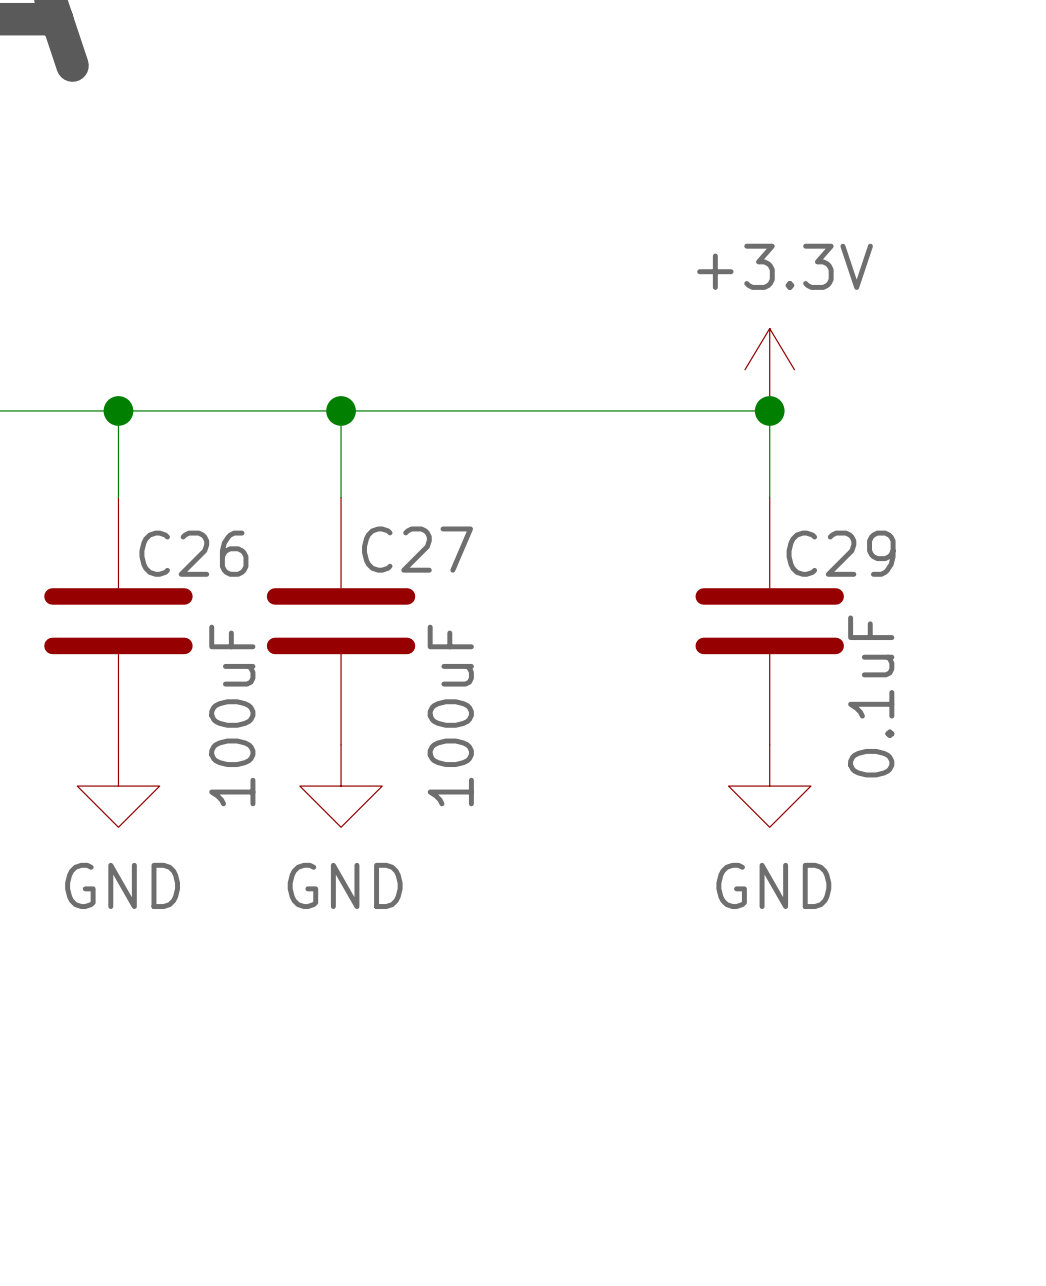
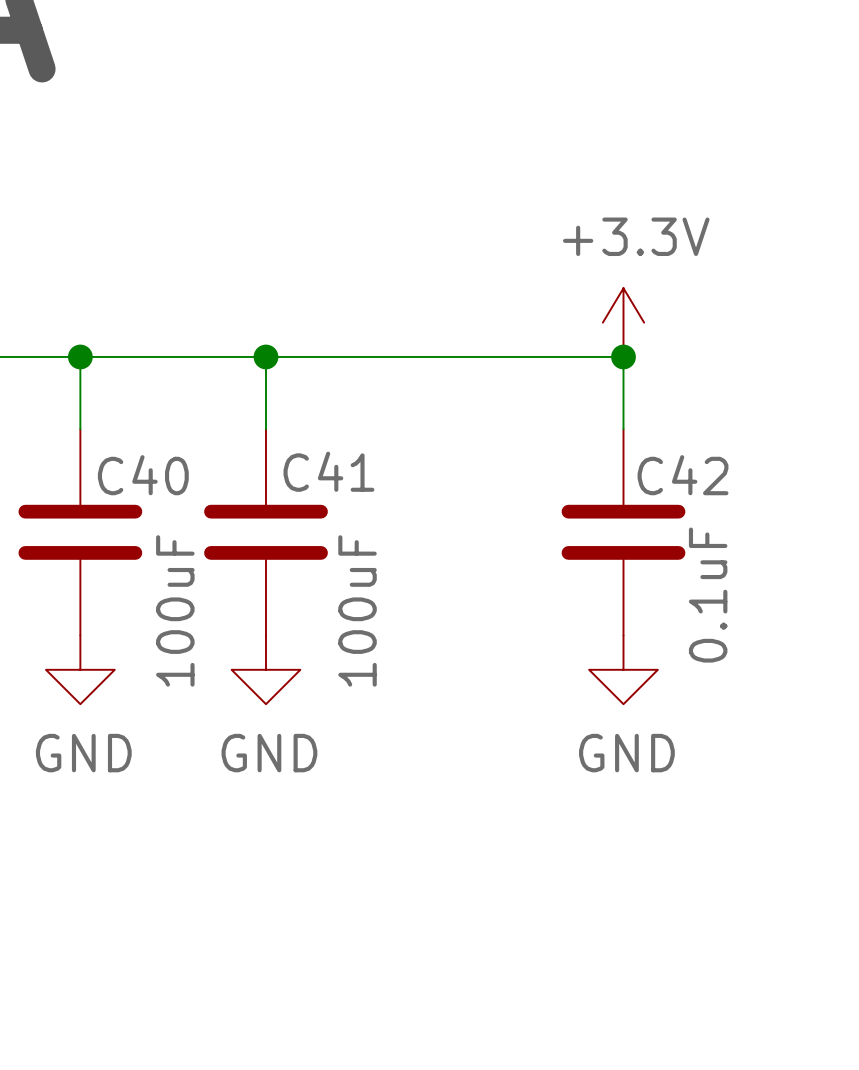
C27 name: C27 (417, 549) -> C41 (328, 471)
C26 name: C26 (193, 553) -> C40 (143, 475)
C29 name: C29 (841, 553) -> C42 (683, 475)

